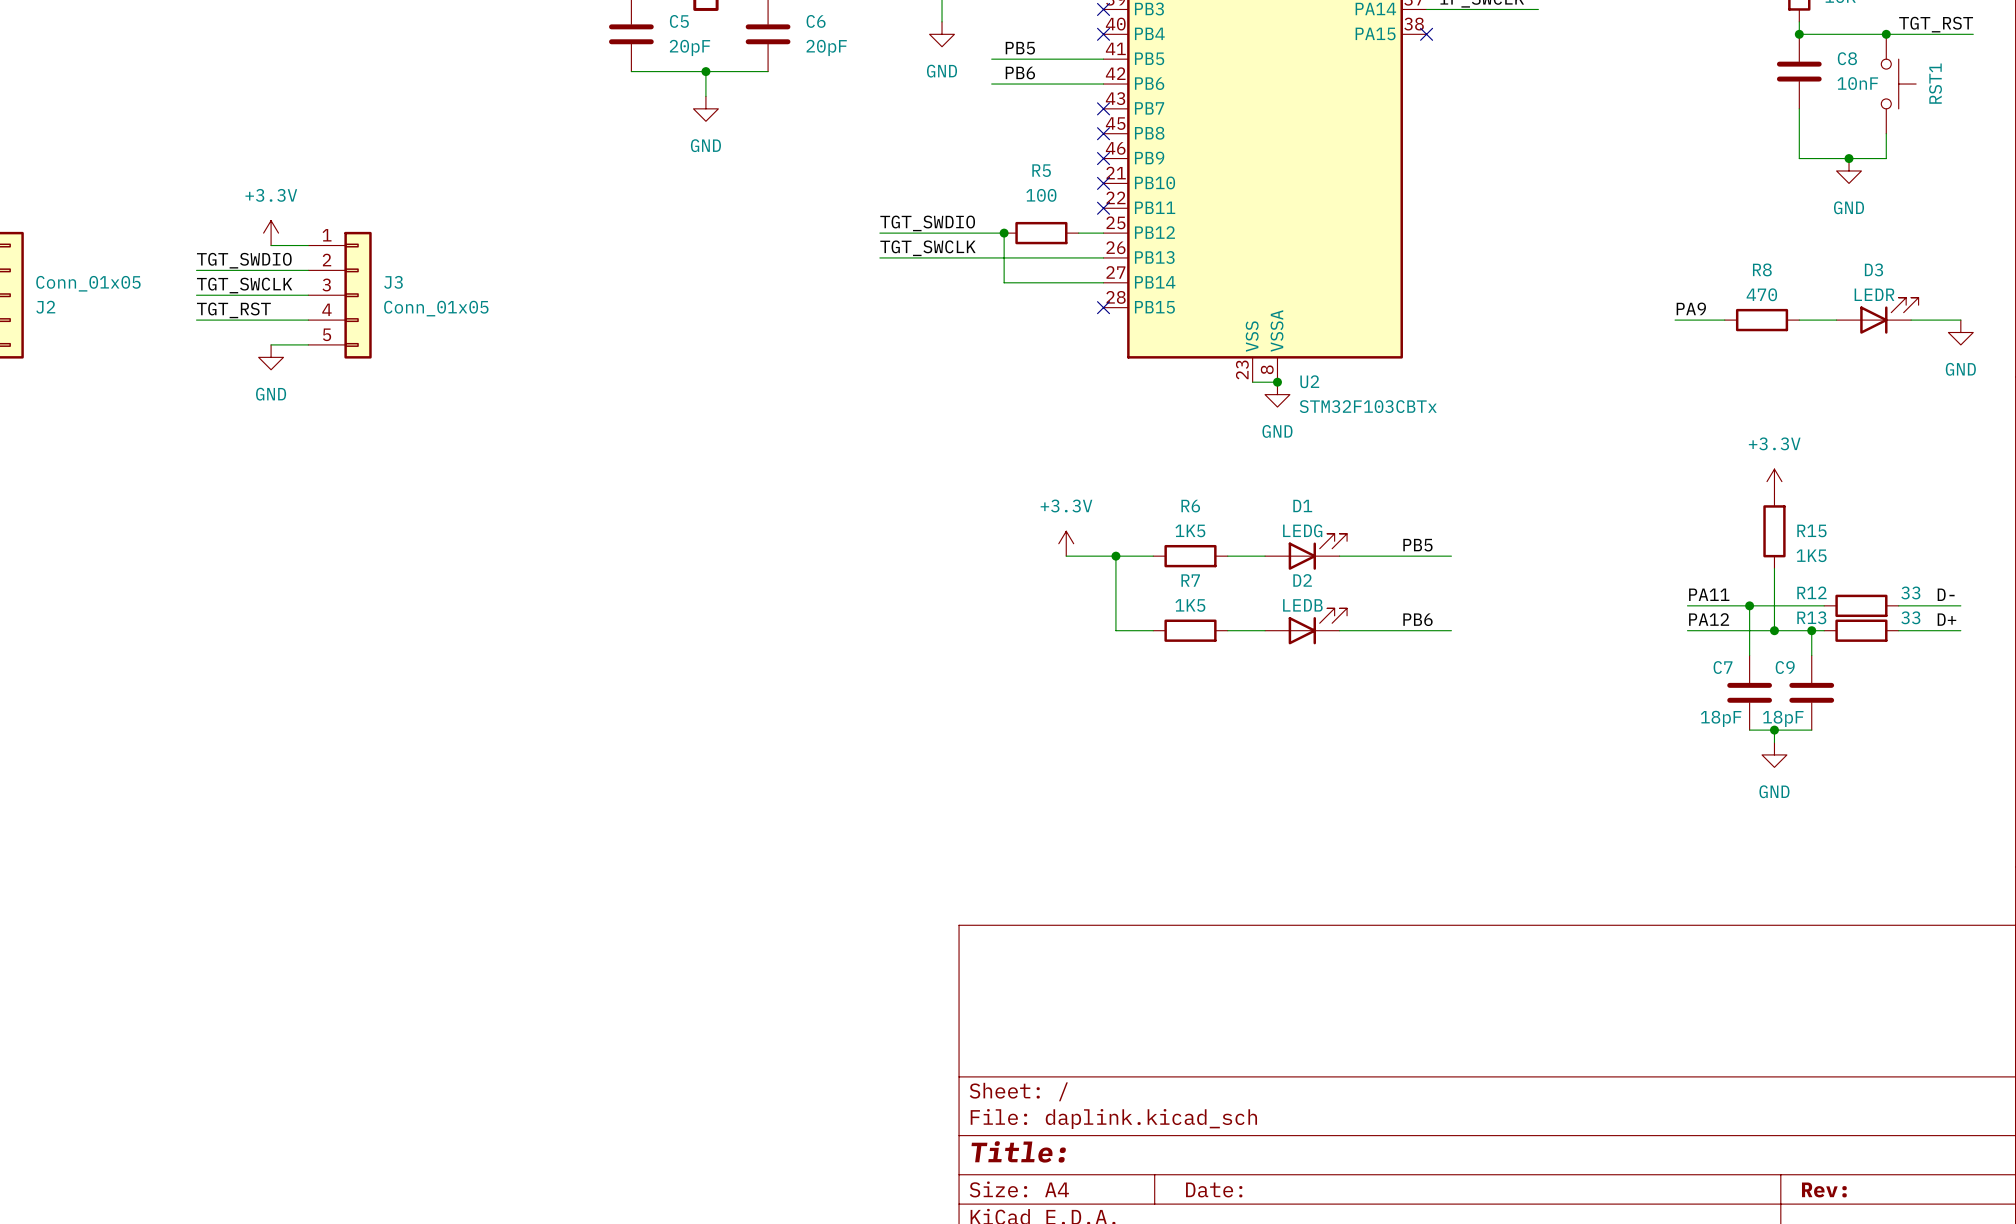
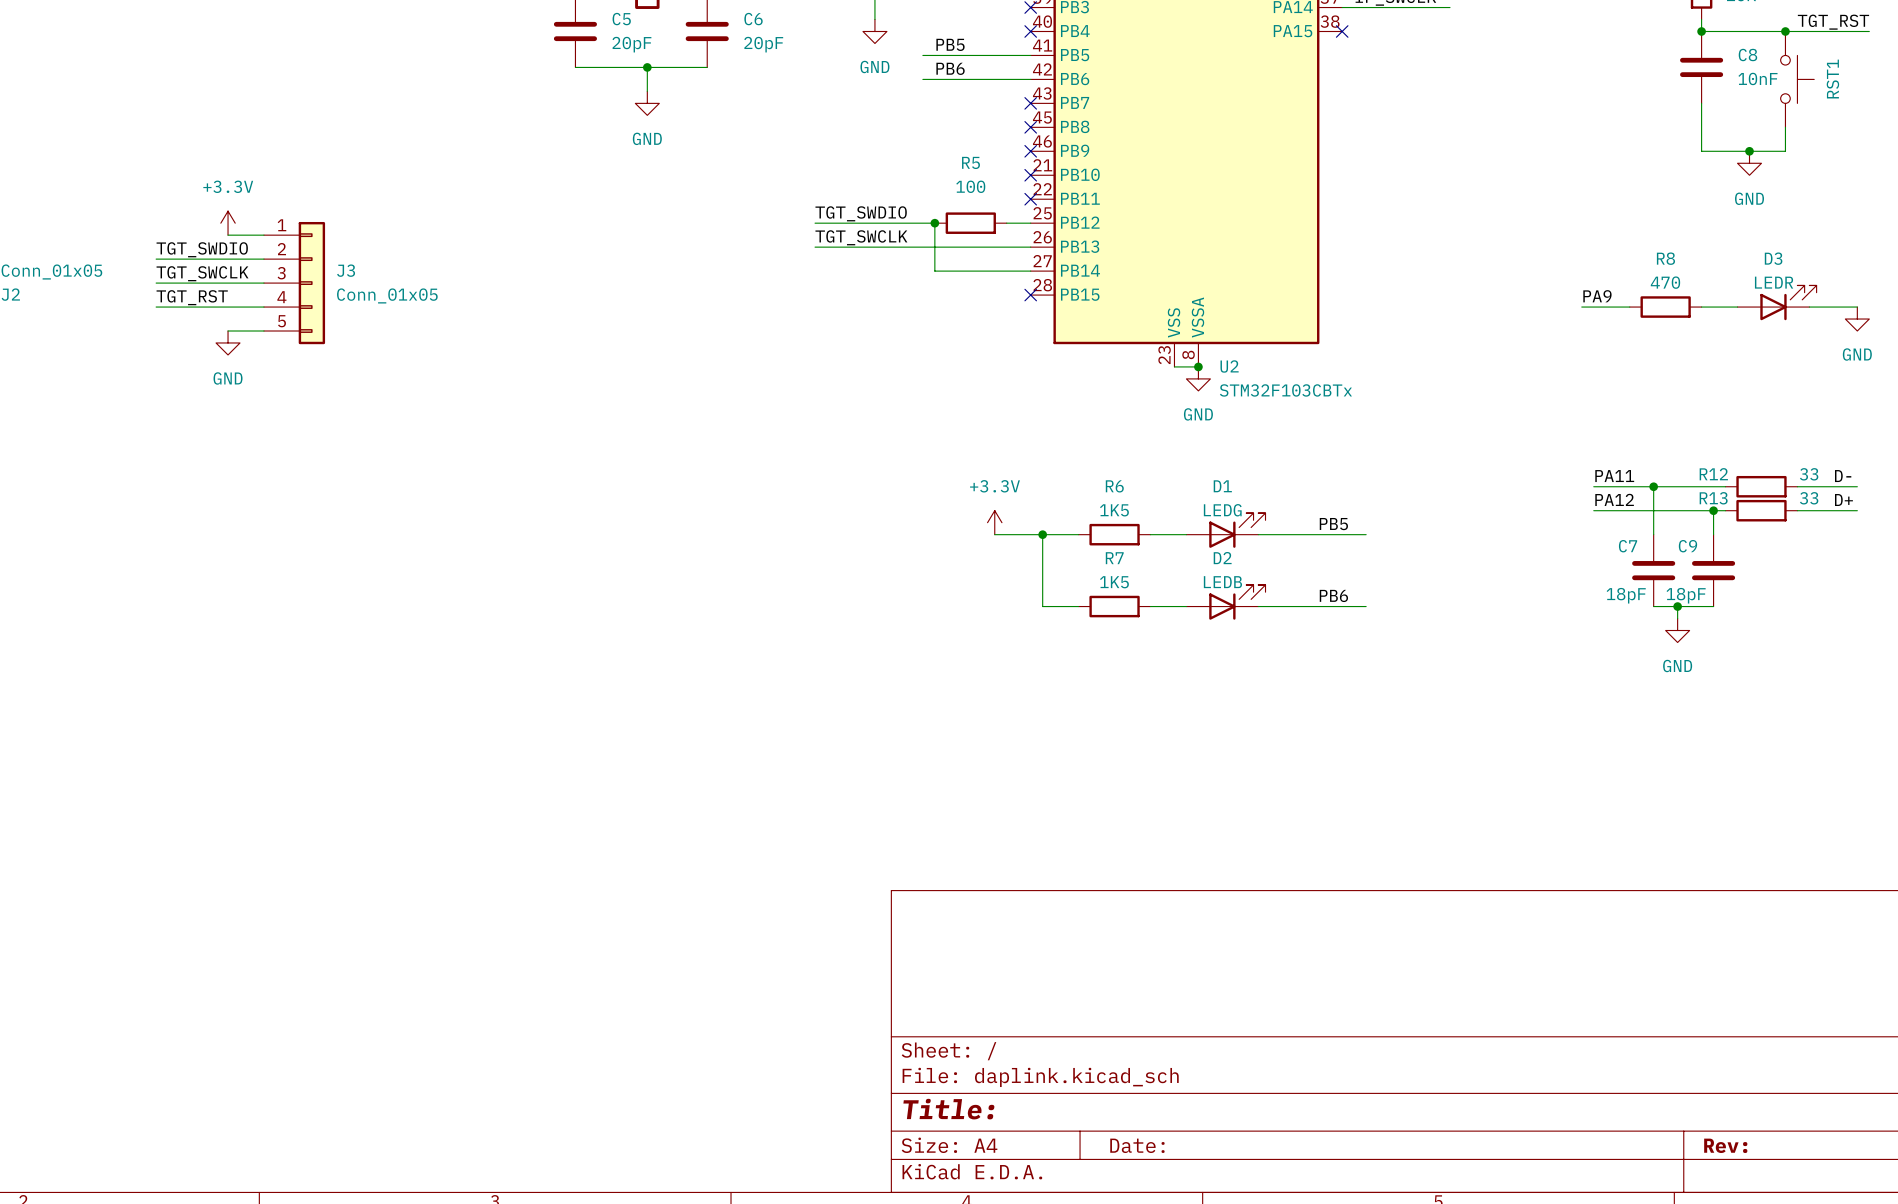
power symbol: +3.3V (1774, 481) -> none
junction: none -> (1653, 486)
wire: none -> (1593, 510) (1725, 510)
R15: 1K5 (1774, 531) -> none
wire: none -> (1713, 510) (1713, 534)
junction: none -> (1713, 510)
wire: (1774, 568) (1774, 630) -> (1677, 618) (1677, 606)
label position: PA11 (1709, 594) -> PA11 (1614, 476)
label position: D- (1946, 594) -> D- (1843, 476)
wire: (1687, 605) (1824, 605) -> (1593, 486) (1725, 486)
wire: (1749, 605) (1749, 655) -> (1653, 486) (1653, 534)
junction: (1749, 605) -> none
R12 position: (1861, 605) -> (1761, 486)
wire: (1898, 605) (1960, 605) -> (1797, 486) (1857, 486)
label position: PA12 (1709, 619) -> PA12 (1614, 499)
label position: D+ (1946, 619) -> D+ (1843, 500)
wire: (1687, 630) (1749, 630) -> none
junction: (1811, 630) -> none
wire: (1824, 630) (1811, 630) (1811, 655) -> none
R13 position: (1861, 630) -> (1761, 510)
wire: (1898, 630) (1960, 630) -> (1797, 510) (1857, 510)
C7 position: (1749, 692) -> (1653, 570)
C9 position: (1811, 692) -> (1713, 570)
wire: (1749, 730) (1811, 730) -> none
wire: (1774, 730) (1774, 742) -> none
junction: (1774, 730) -> none
power symbol position: GND (1774, 754) -> GND (1677, 630)

